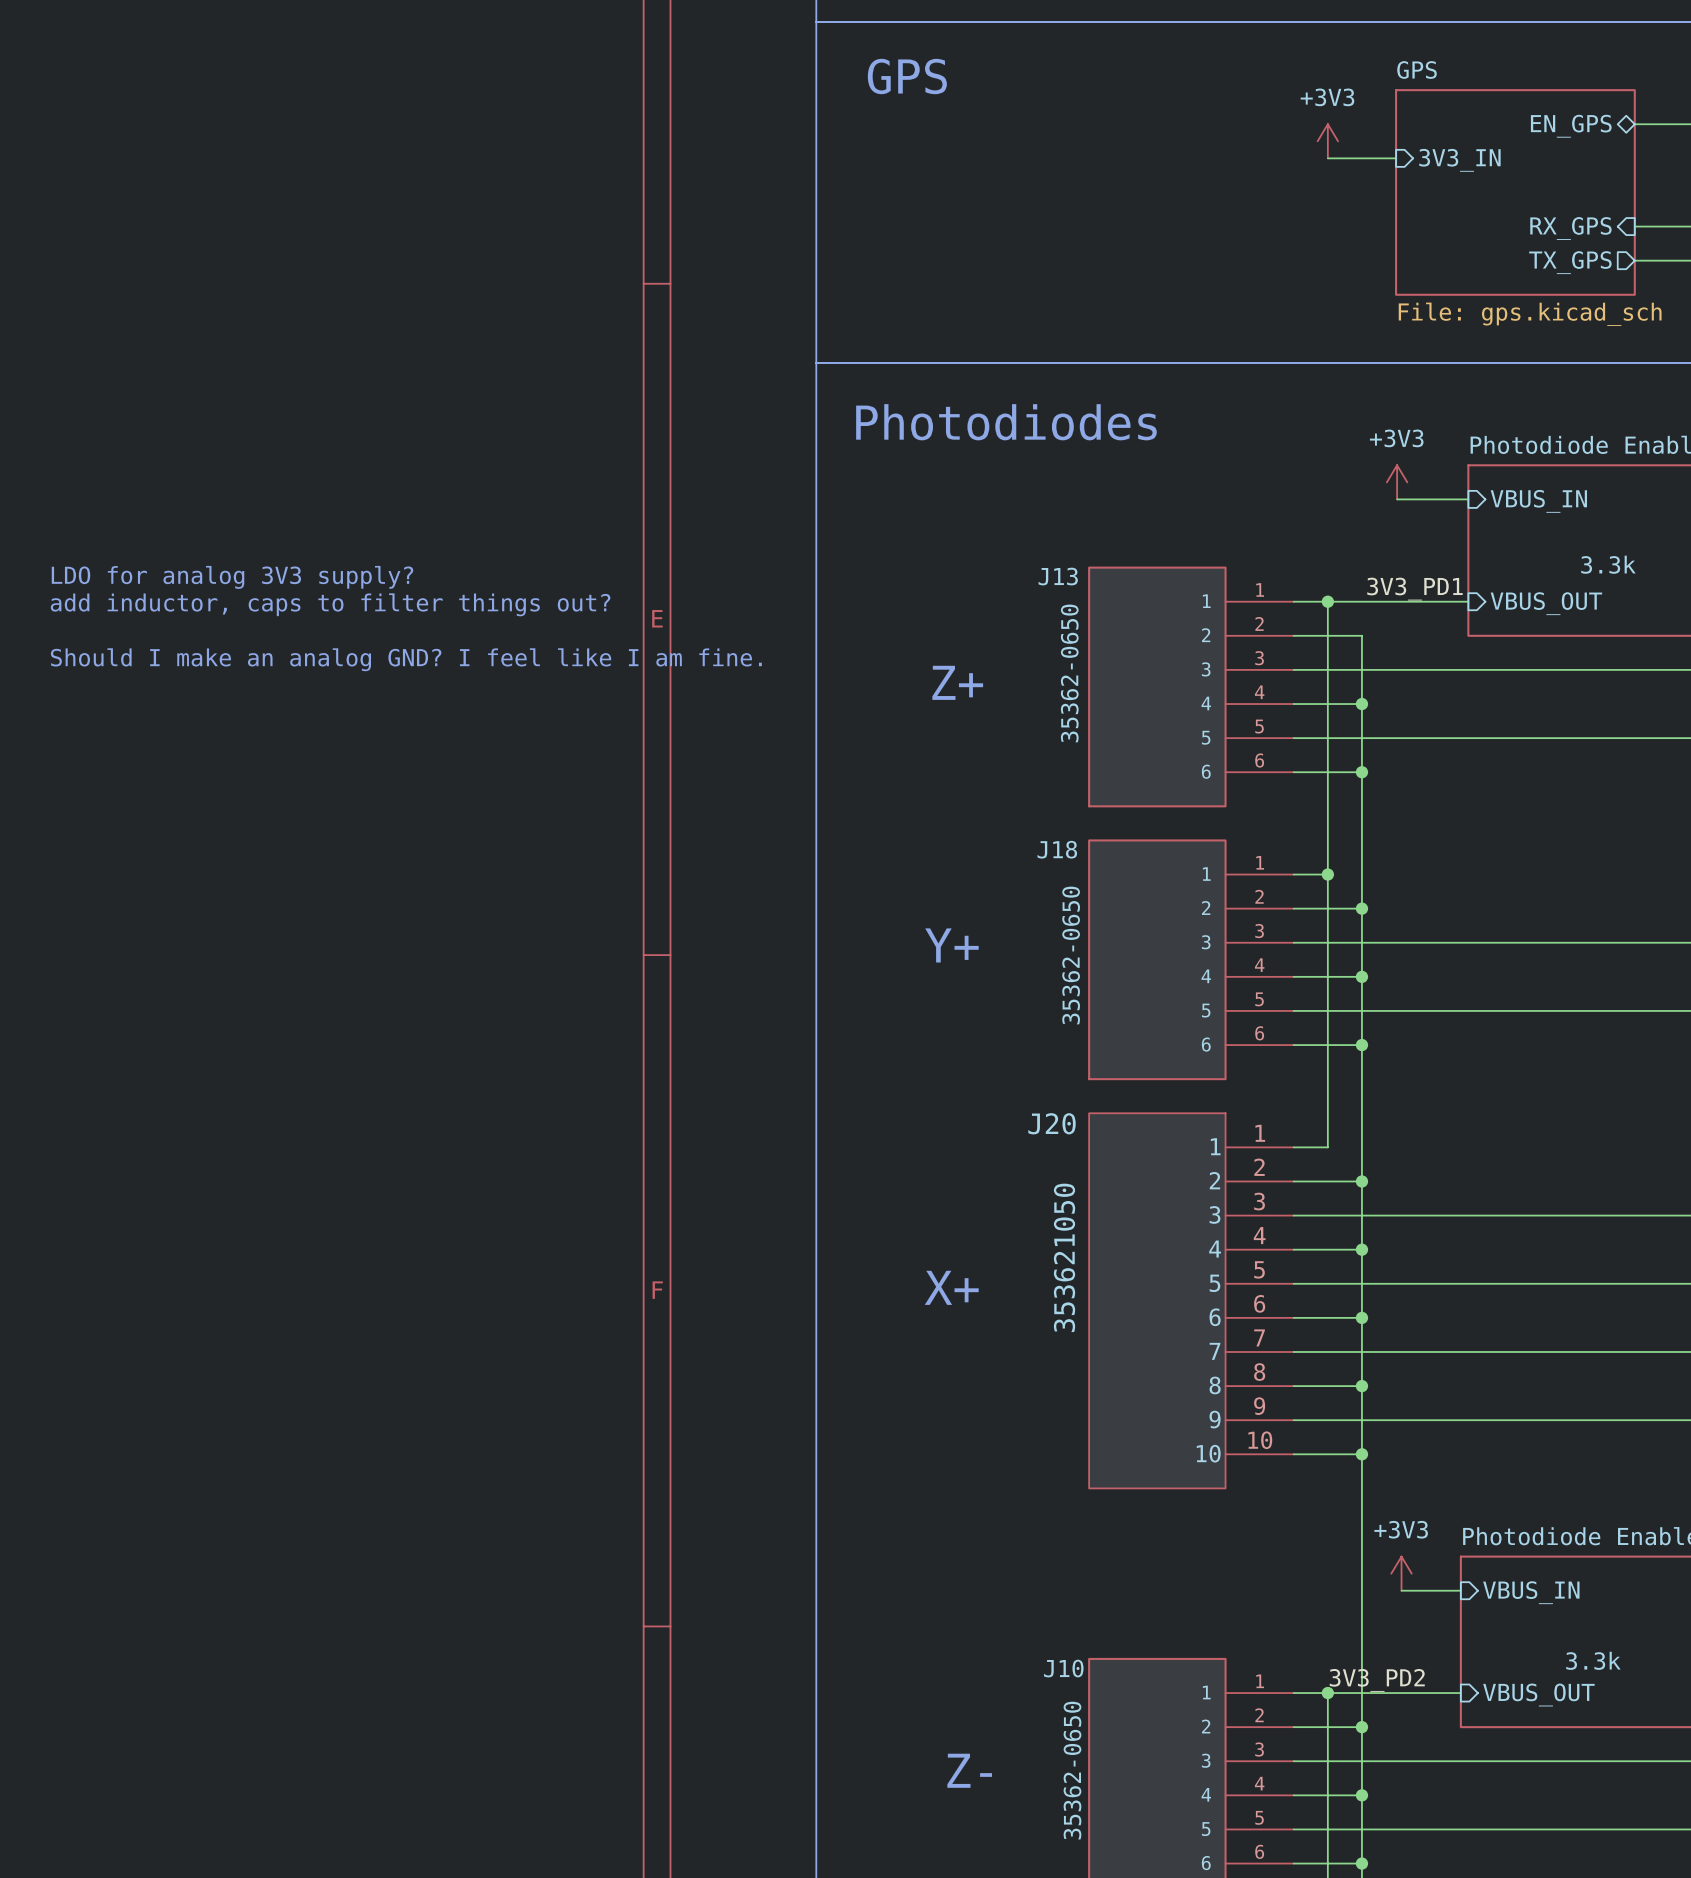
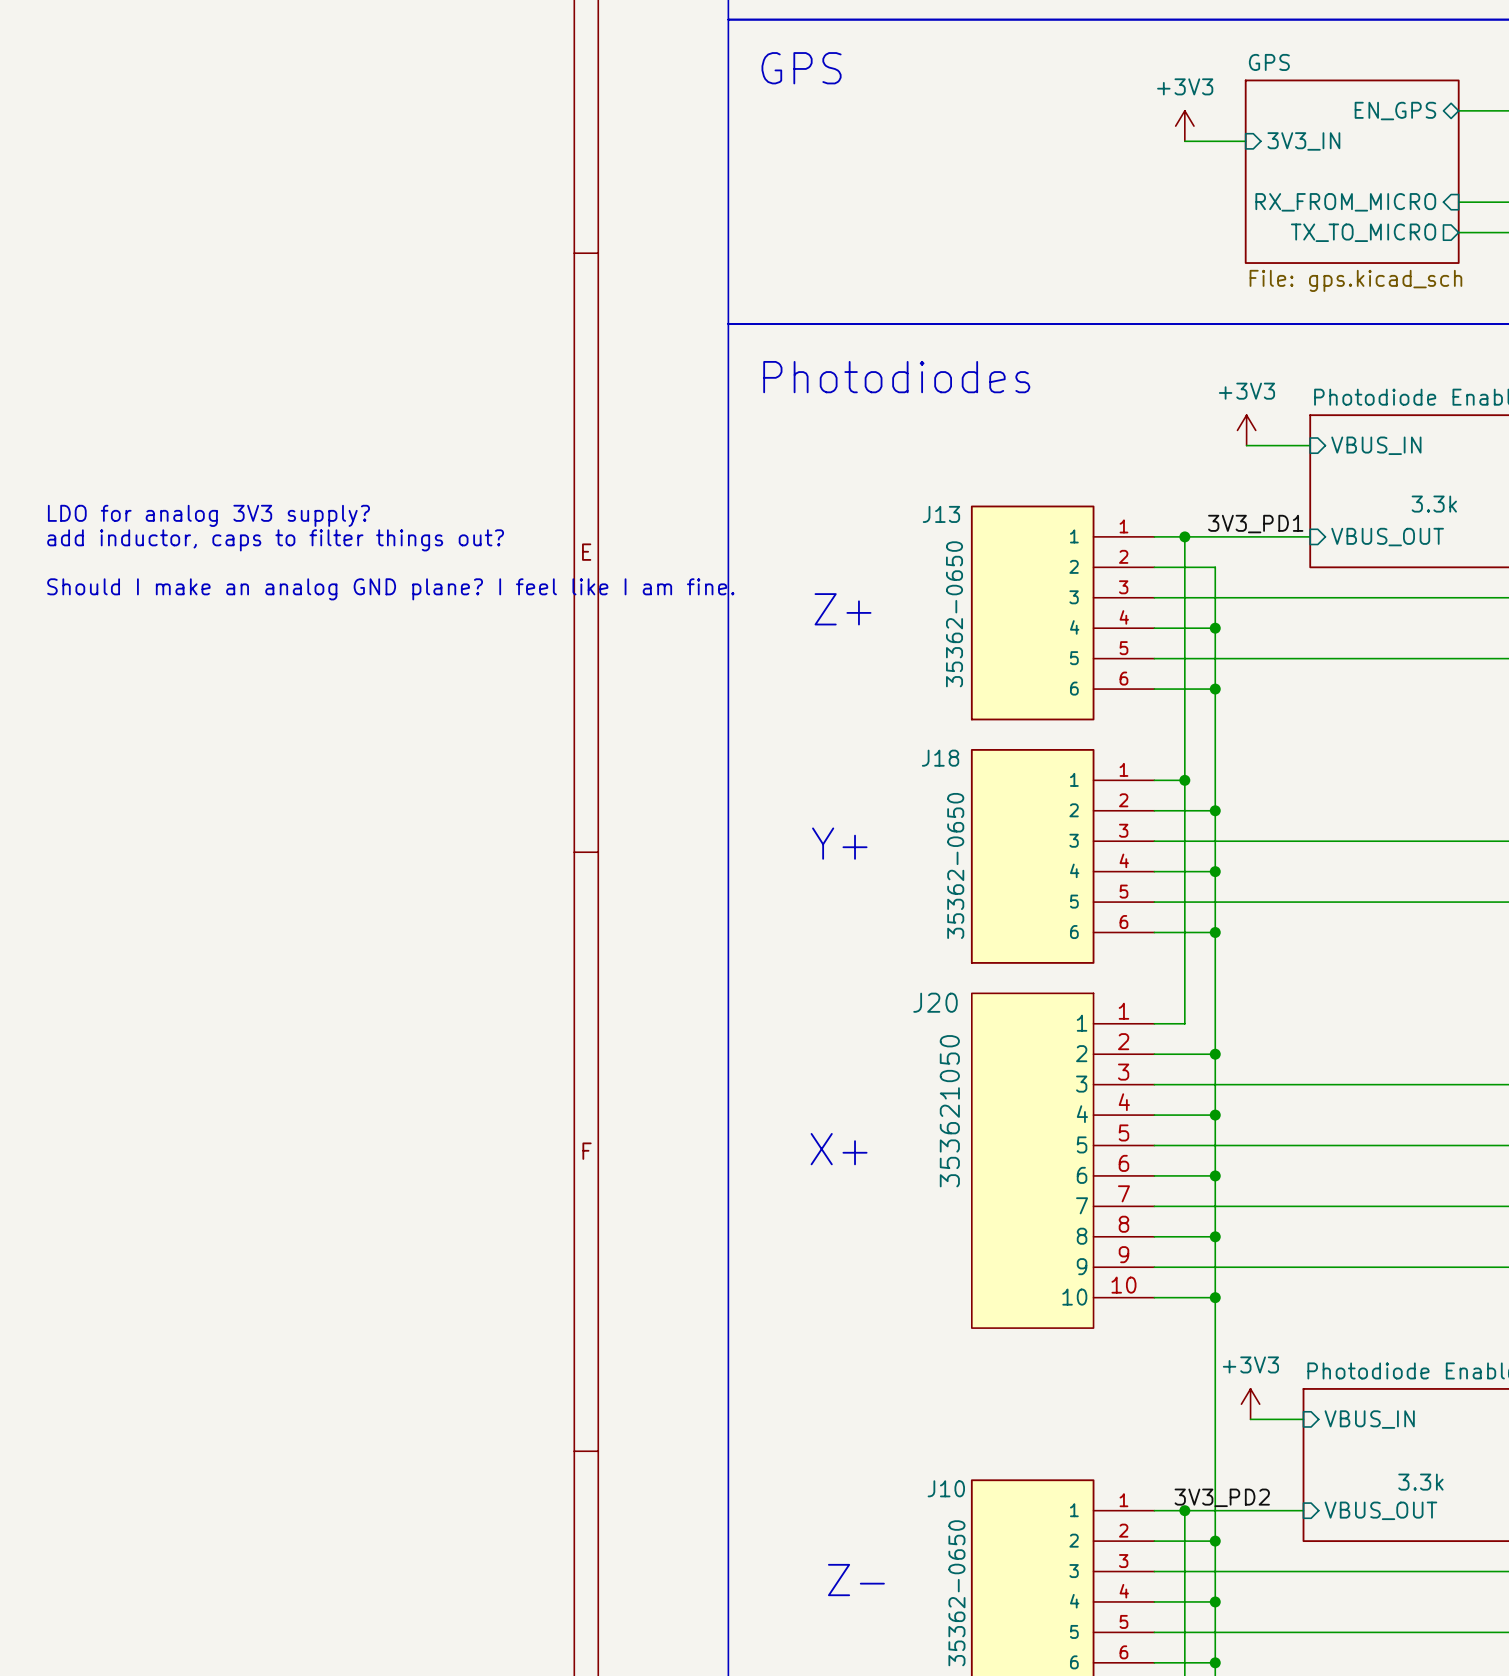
sheet pin: RX_GPS (1570, 228) -> RX_FROM_MICRO (1345, 202)
sheet pin: TX_GPS (1570, 262) -> TX_TO_MICRO (1363, 232)
text: Should I make an analog GND? I feel like I am fine. (406, 659) -> Should I make an analog GND plane? I feel like I am fine. (390, 589)

